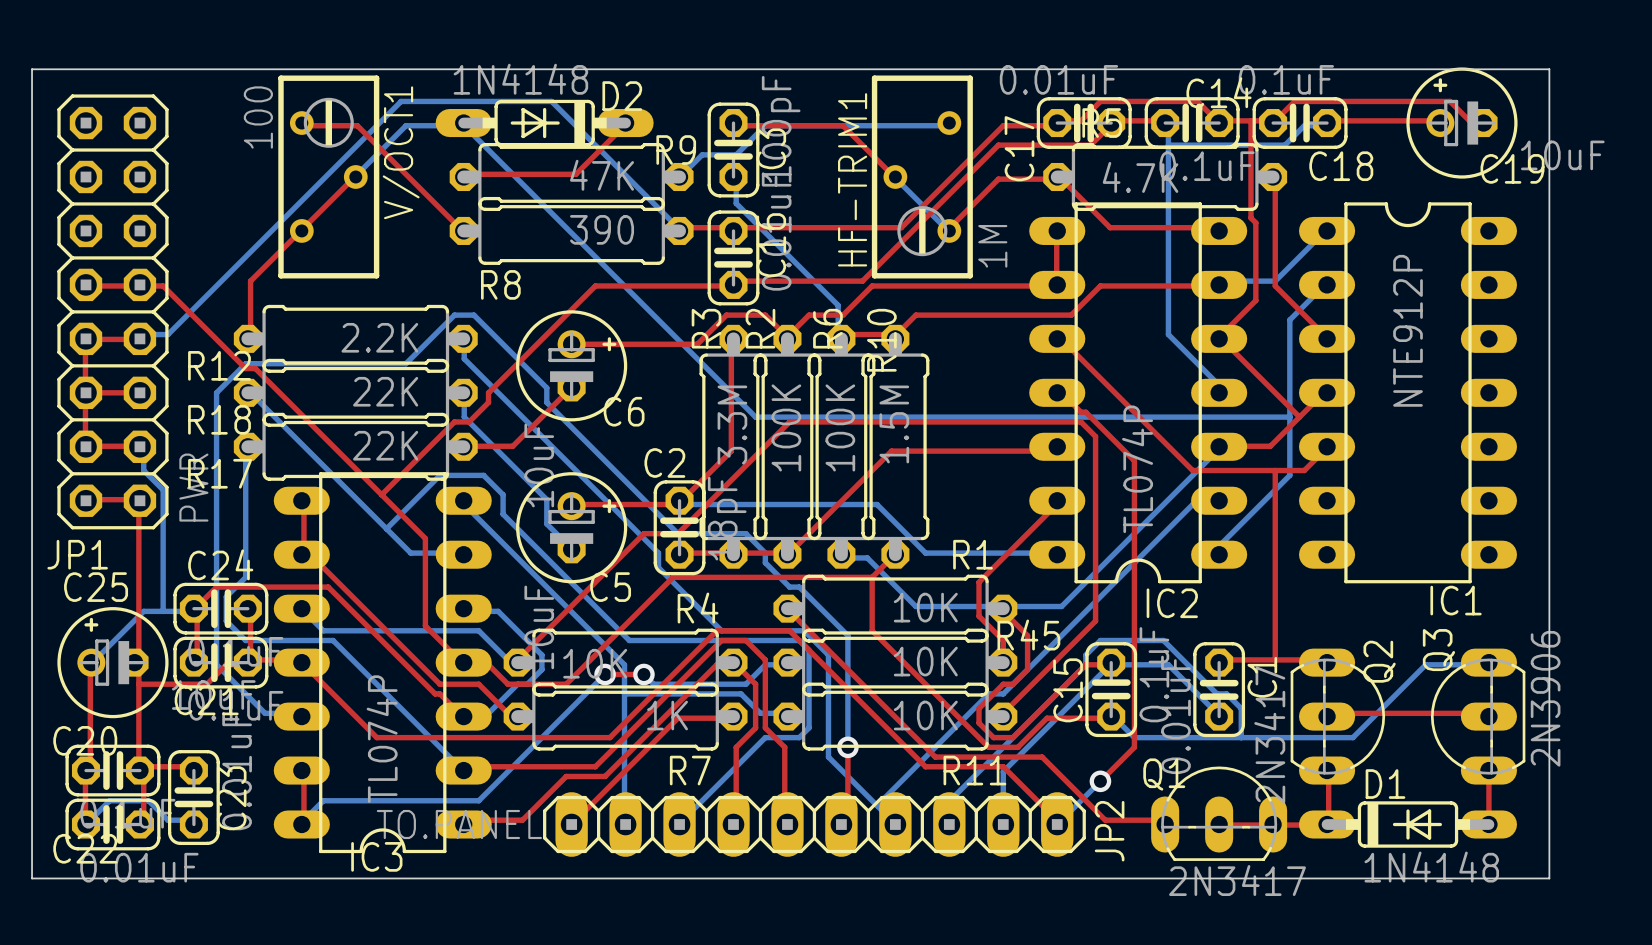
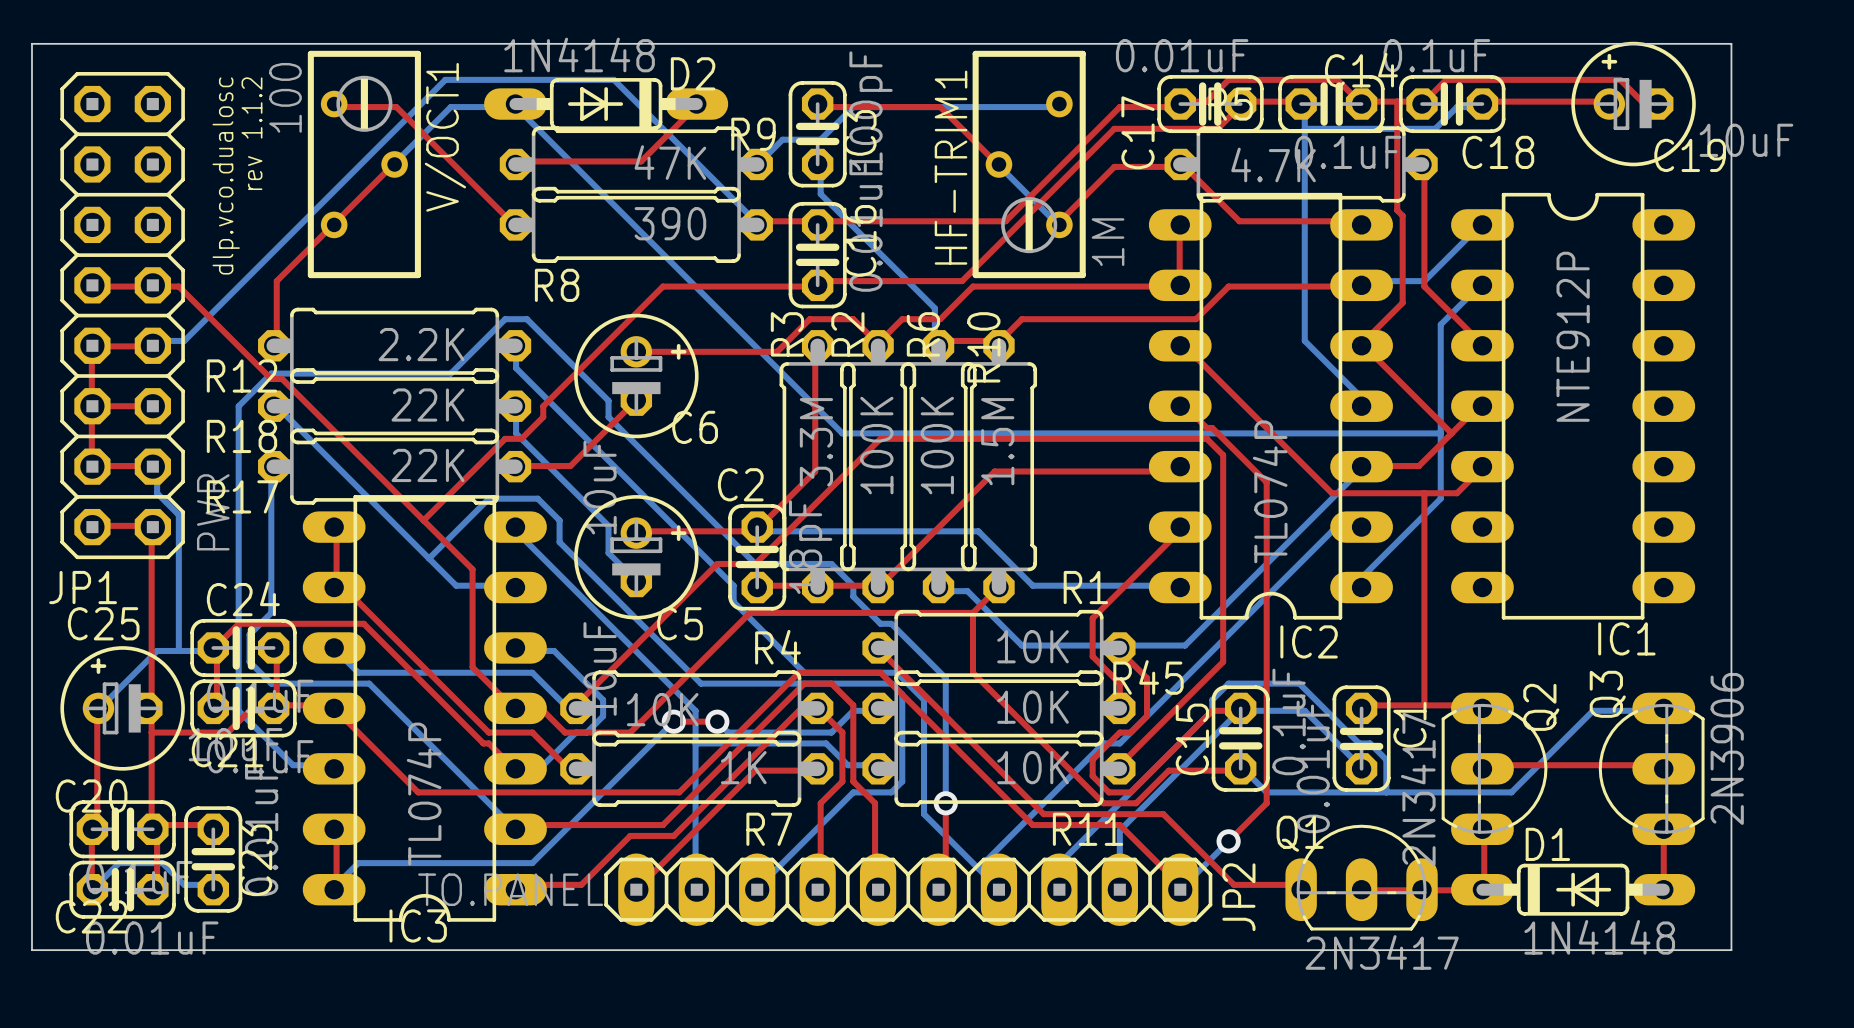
text: none -> rev 1.1.2 (251, 133)
text: none -> dlp.vco.dualosc (226, 175)

